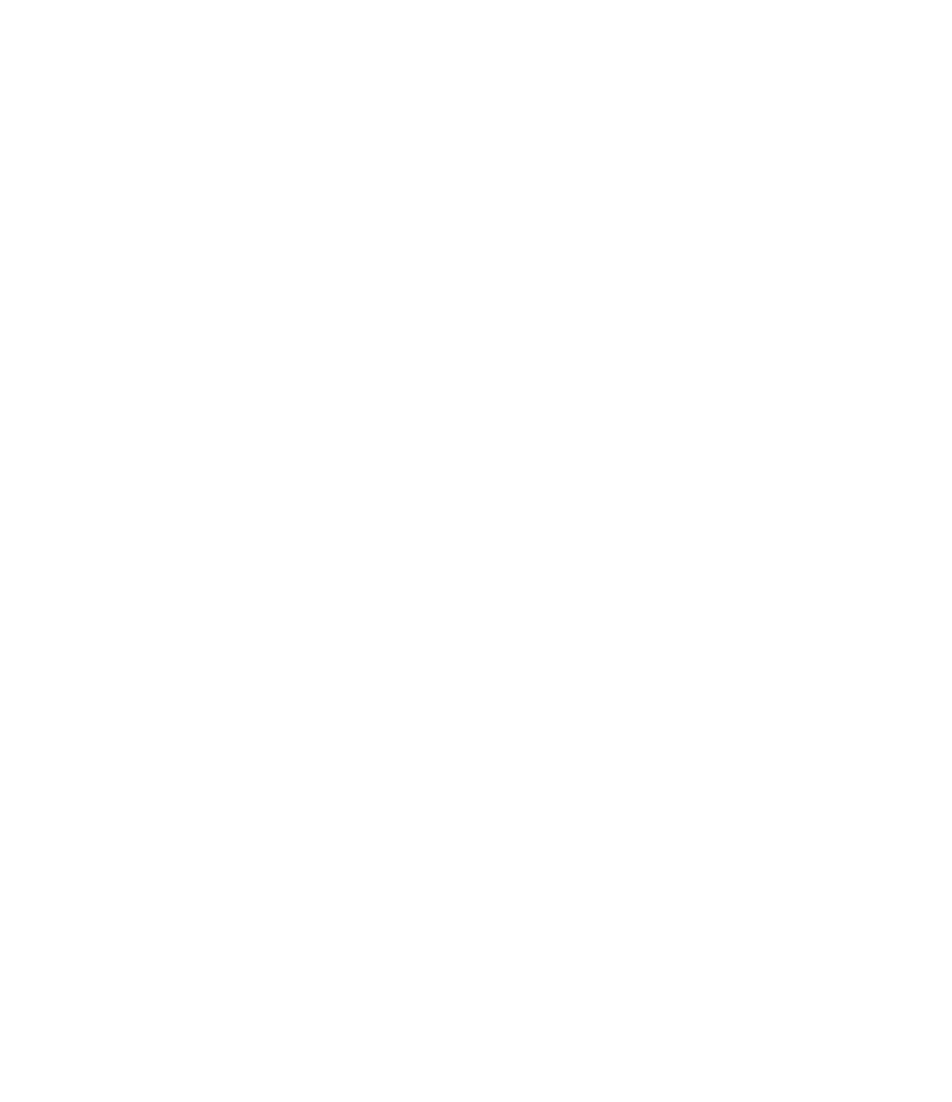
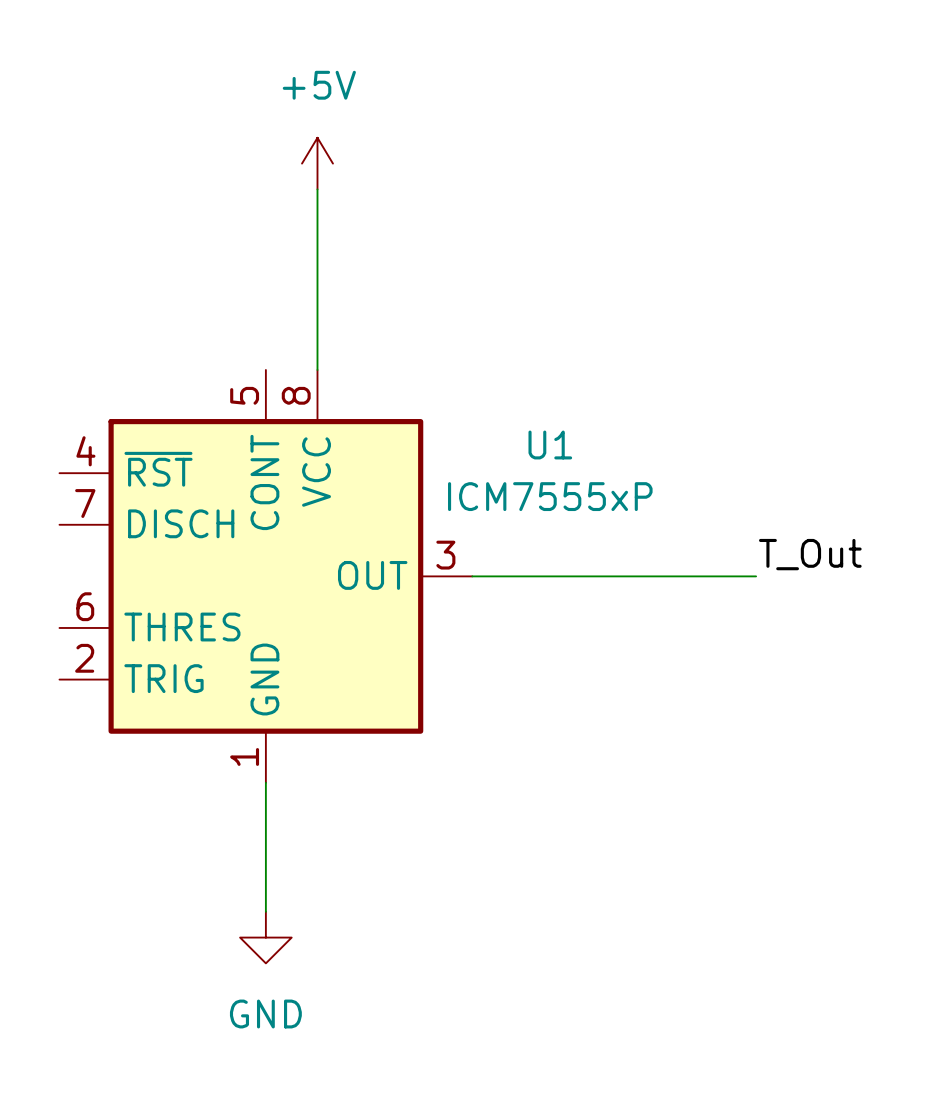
power symbol: none -> +5V (317, 163)
wire: none -> (317, 189) (317, 369)
label: none -> T_Out (810, 554)
U1: none -> ICM7555xP (265, 576)
wire: none -> (472, 576) (756, 576)
wire: none -> (265, 782) (265, 911)
power symbol: none -> GND (265, 937)

